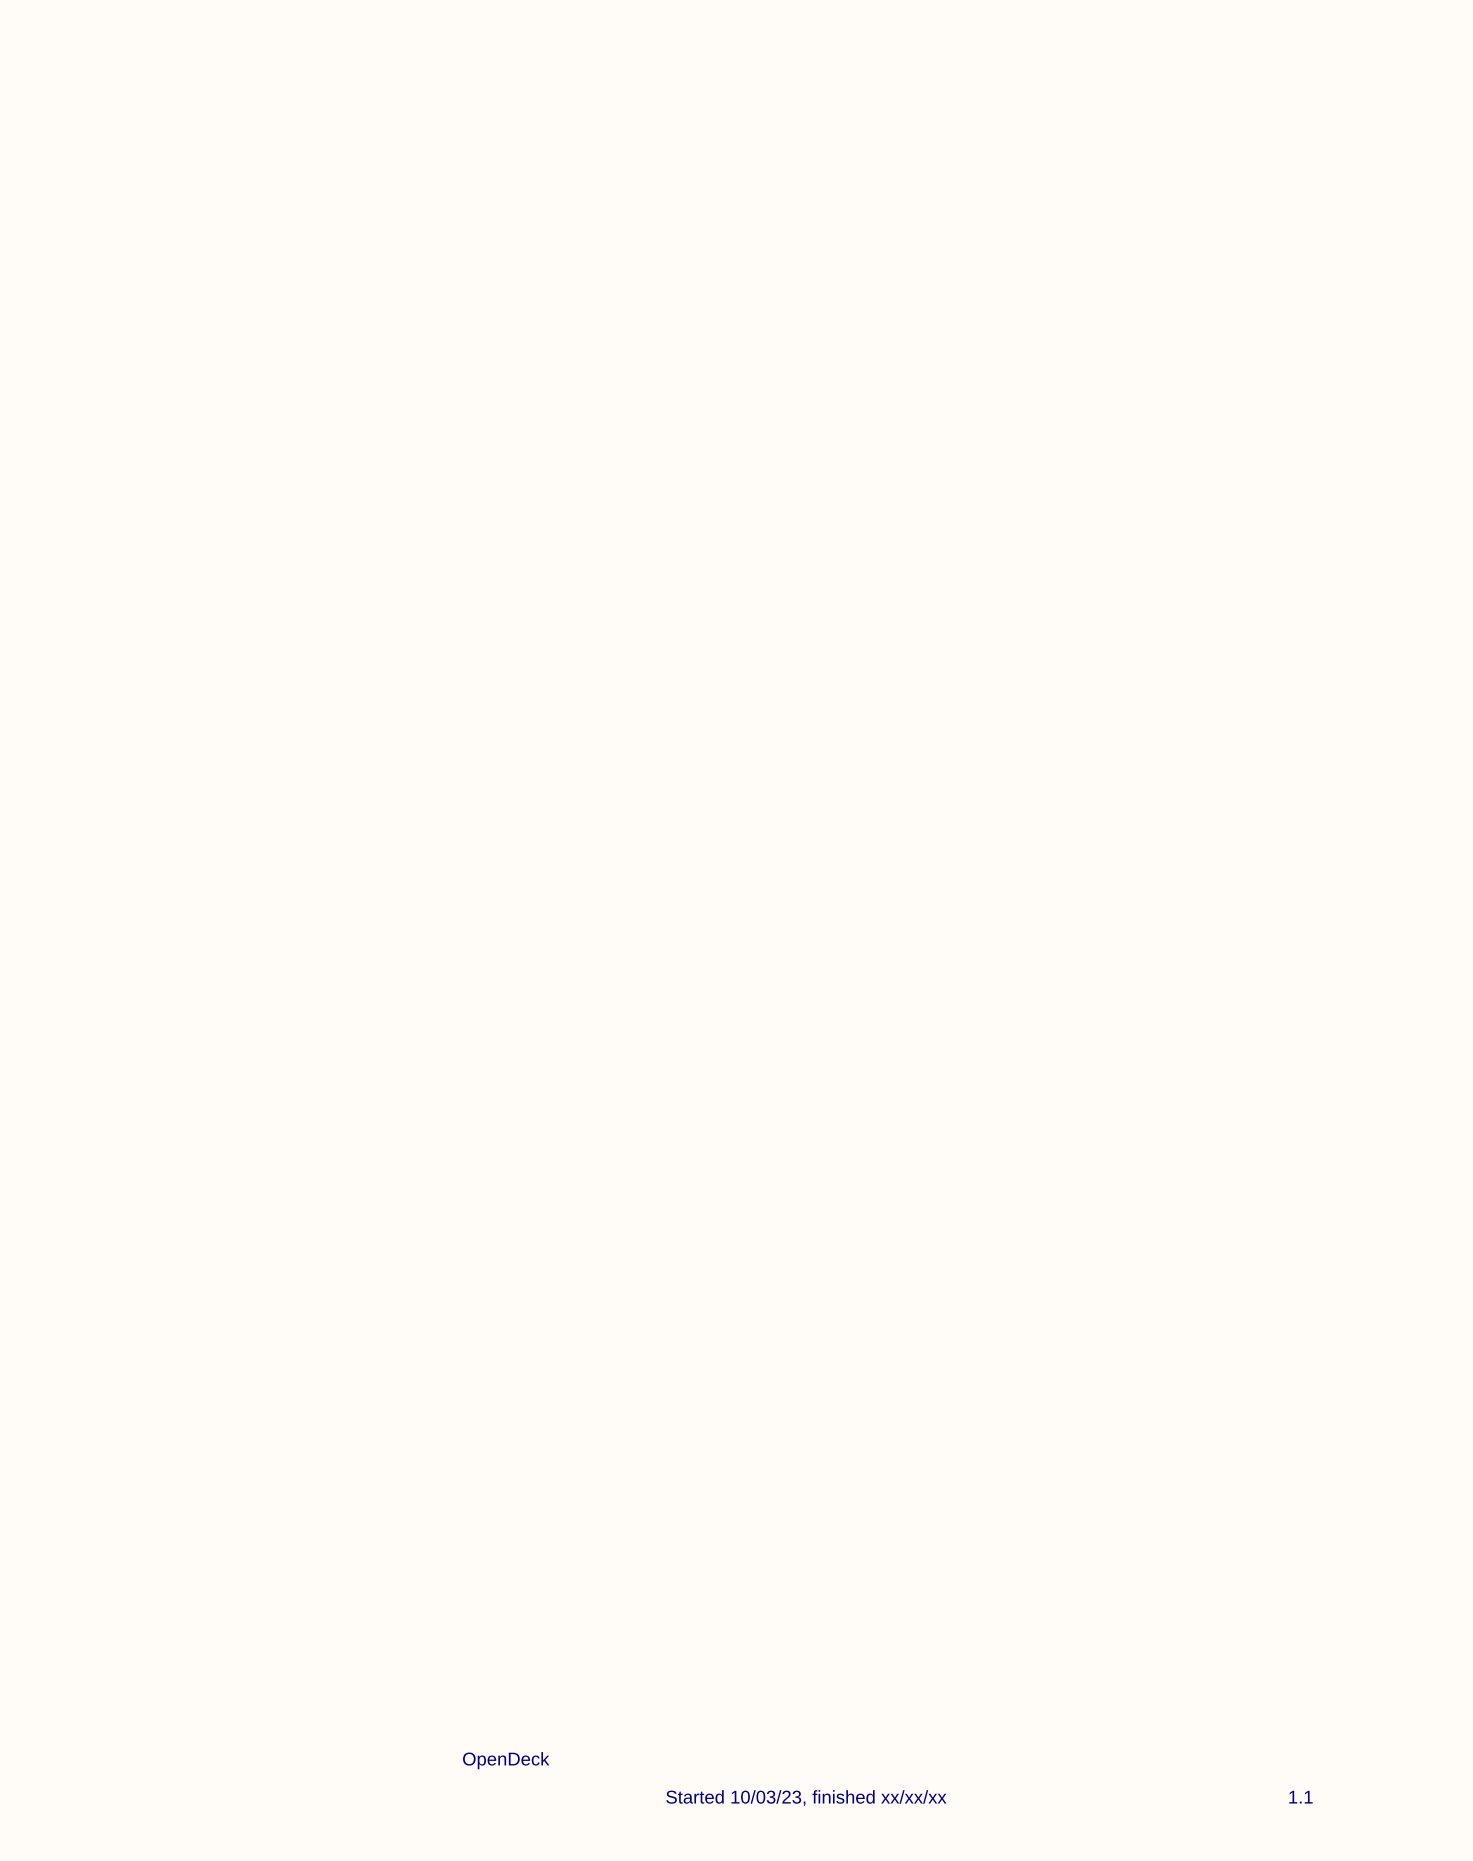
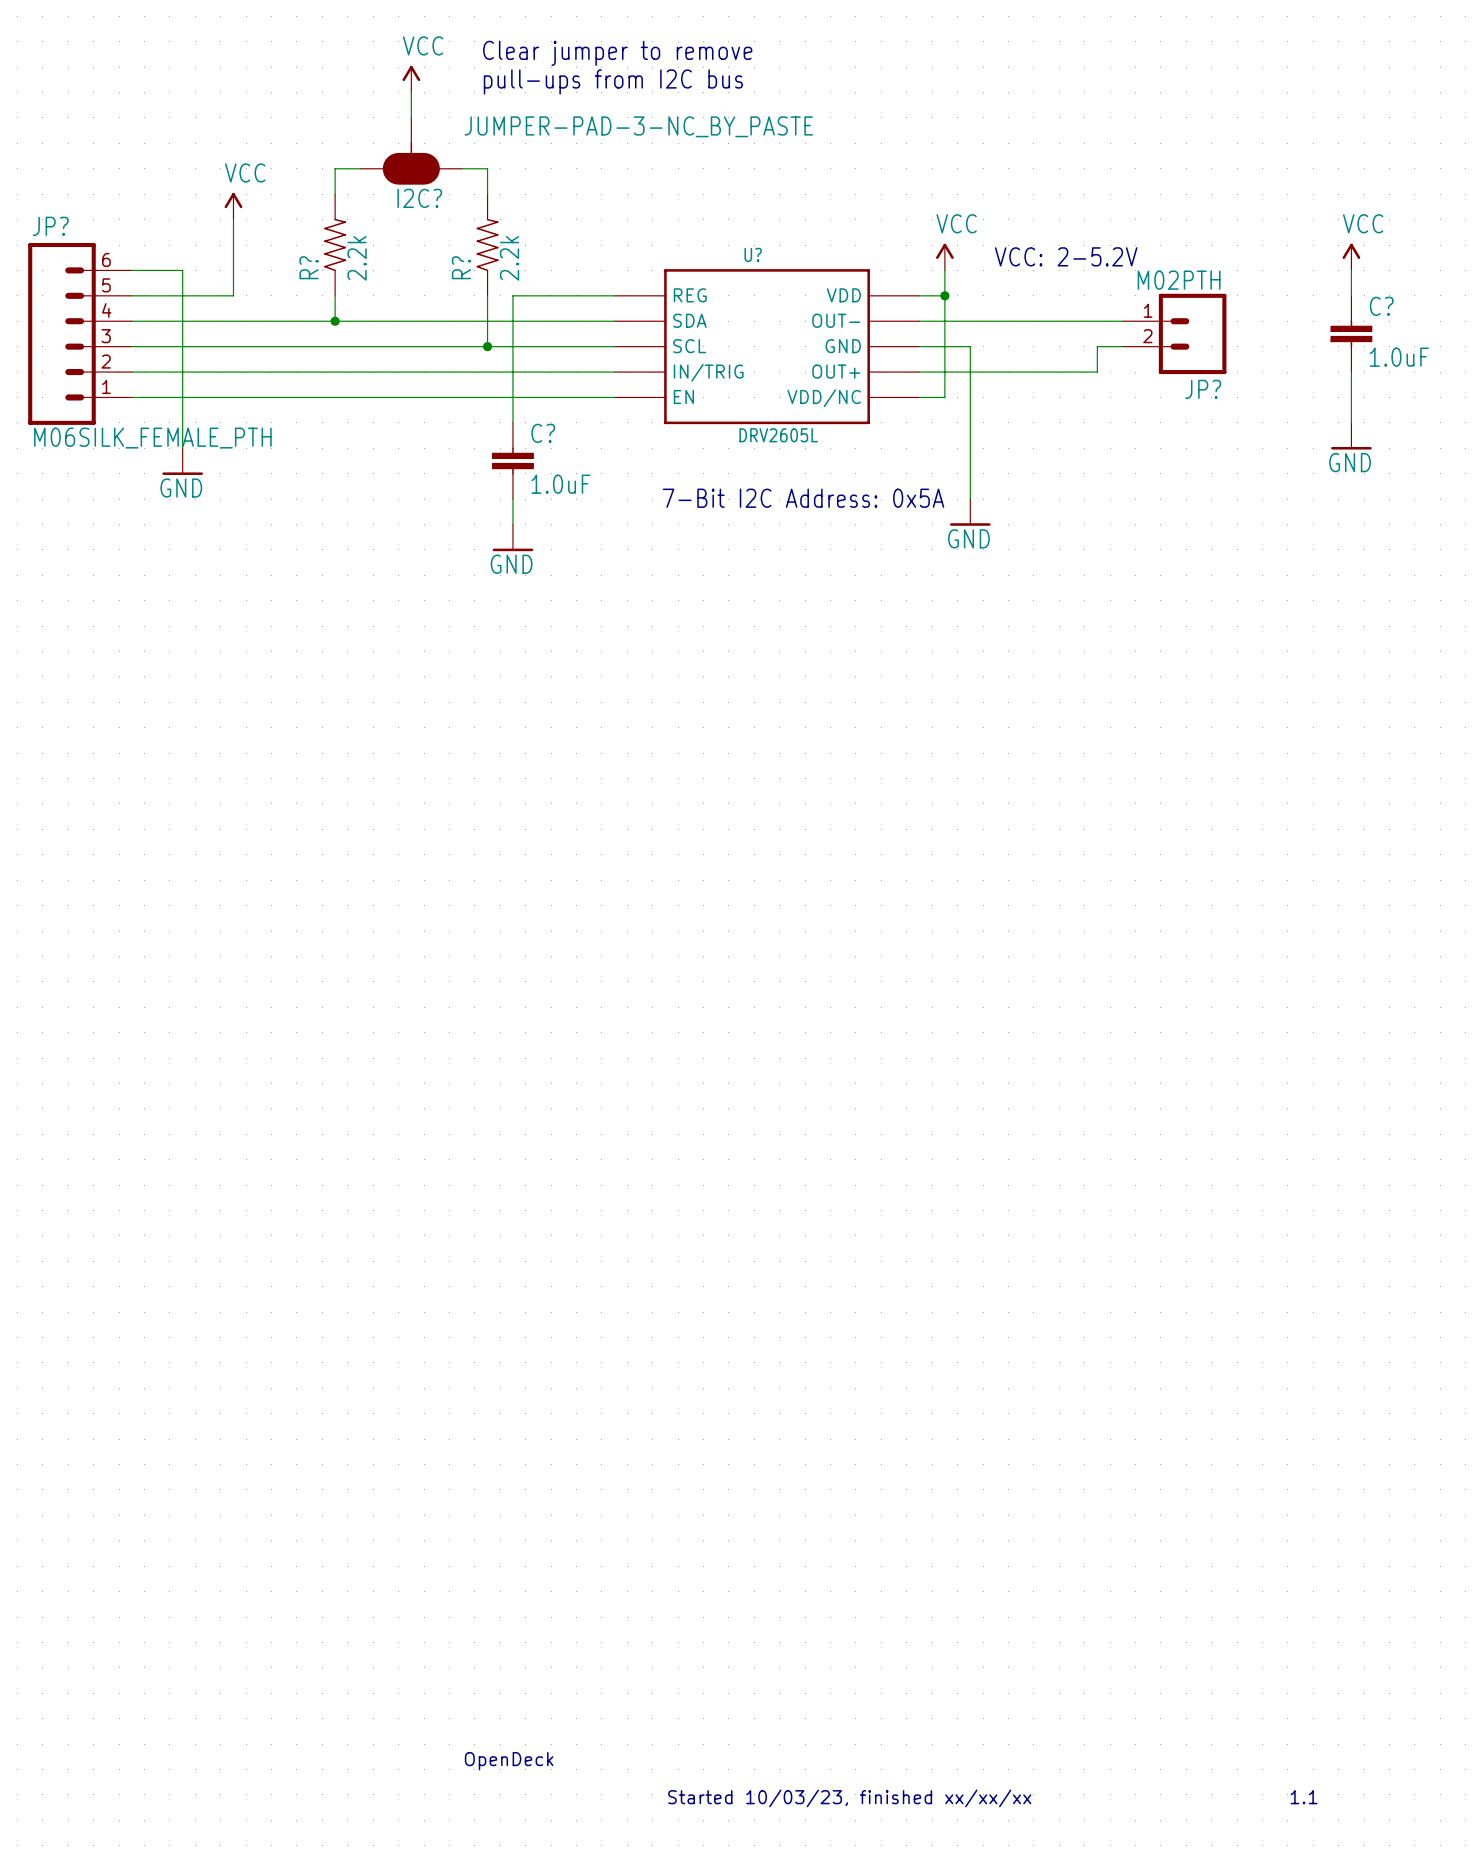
text: none -> Clear jumper to remove (617, 53)
power symbol: none -> VCC (411, 79)
text: none -> pull-ups from I2C bus (613, 81)
wire: none -> (411, 92) (411, 117)
I2C?: none -> JUMPER-PAD-3-NC_BY_PASTE (411, 151)
wire: none -> (360, 168) (335, 168) (335, 194)
wire: none -> (462, 168) (487, 168) (487, 194)
power symbol: none -> VCC (233, 206)
wire: none -> (233, 219) (233, 295) (131, 295)
R?: none -> 2.2k (335, 245)
R?: none -> 2.2k (487, 245)
text: none -> VCC: 2-5.2V (1066, 256)
power symbol: none -> VCC (944, 257)
power symbol: none -> VCC (1351, 257)
wire: none -> (131, 270) (182, 270) (182, 448)
wire: none -> (944, 270) (944, 397) (919, 397)
wire: none -> (1351, 270) (1351, 295)
wire: none -> (335, 295) (335, 321)
wire: none -> (487, 295) (487, 346)
wire: none -> (614, 295) (512, 295) (512, 422)
wire: none -> (919, 295) (944, 295)
junction: none -> (944, 295)
wire: none -> (131, 321) (614, 321)
junction: none -> (335, 321)
wire: none -> (919, 321) (1122, 321)
JP?: none -> M06SILK_FEMALE_PTH (80, 333)
JP?: none -> M02PTH (1174, 333)
C?: none -> 1.0uF (1351, 333)
wire: none -> (131, 346) (614, 346)
junction: none -> (487, 346)
U?: none -> DRV2605L (767, 346)
wire: none -> (919, 346) (970, 346) (970, 499)
wire: none -> (1122, 346) (1097, 346) (1097, 372) (919, 372)
wire: none -> (131, 372) (614, 372)
wire: none -> (1351, 372) (1351, 422)
wire: none -> (131, 397) (614, 397)
power symbol: none -> GND (1351, 436)
C?: none -> 1.0uF (512, 460)
power symbol: none -> GND (182, 461)
text: none -> 7-Bit I2C Address: 0x5A (803, 498)
wire: none -> (512, 499) (512, 524)
power symbol: none -> GND (970, 512)
power symbol: none -> GND (512, 537)

